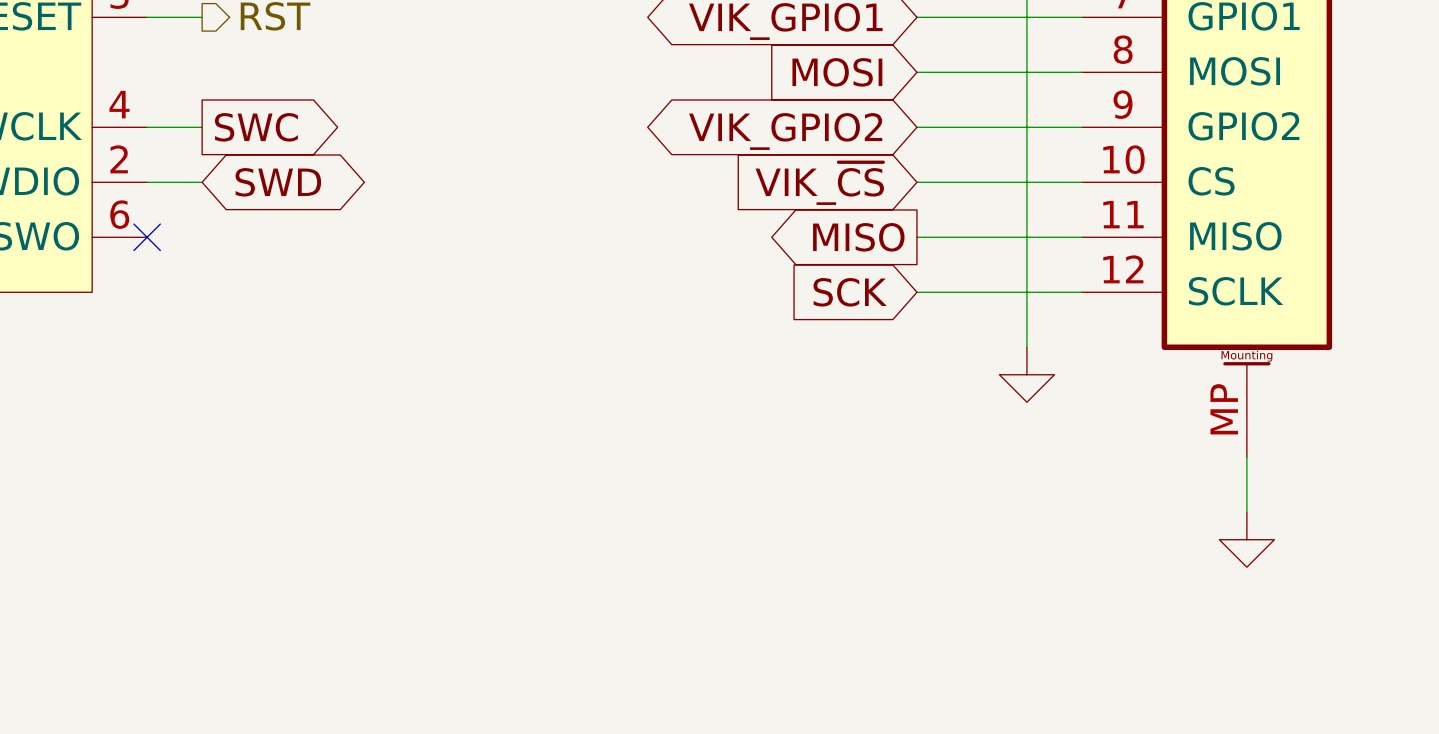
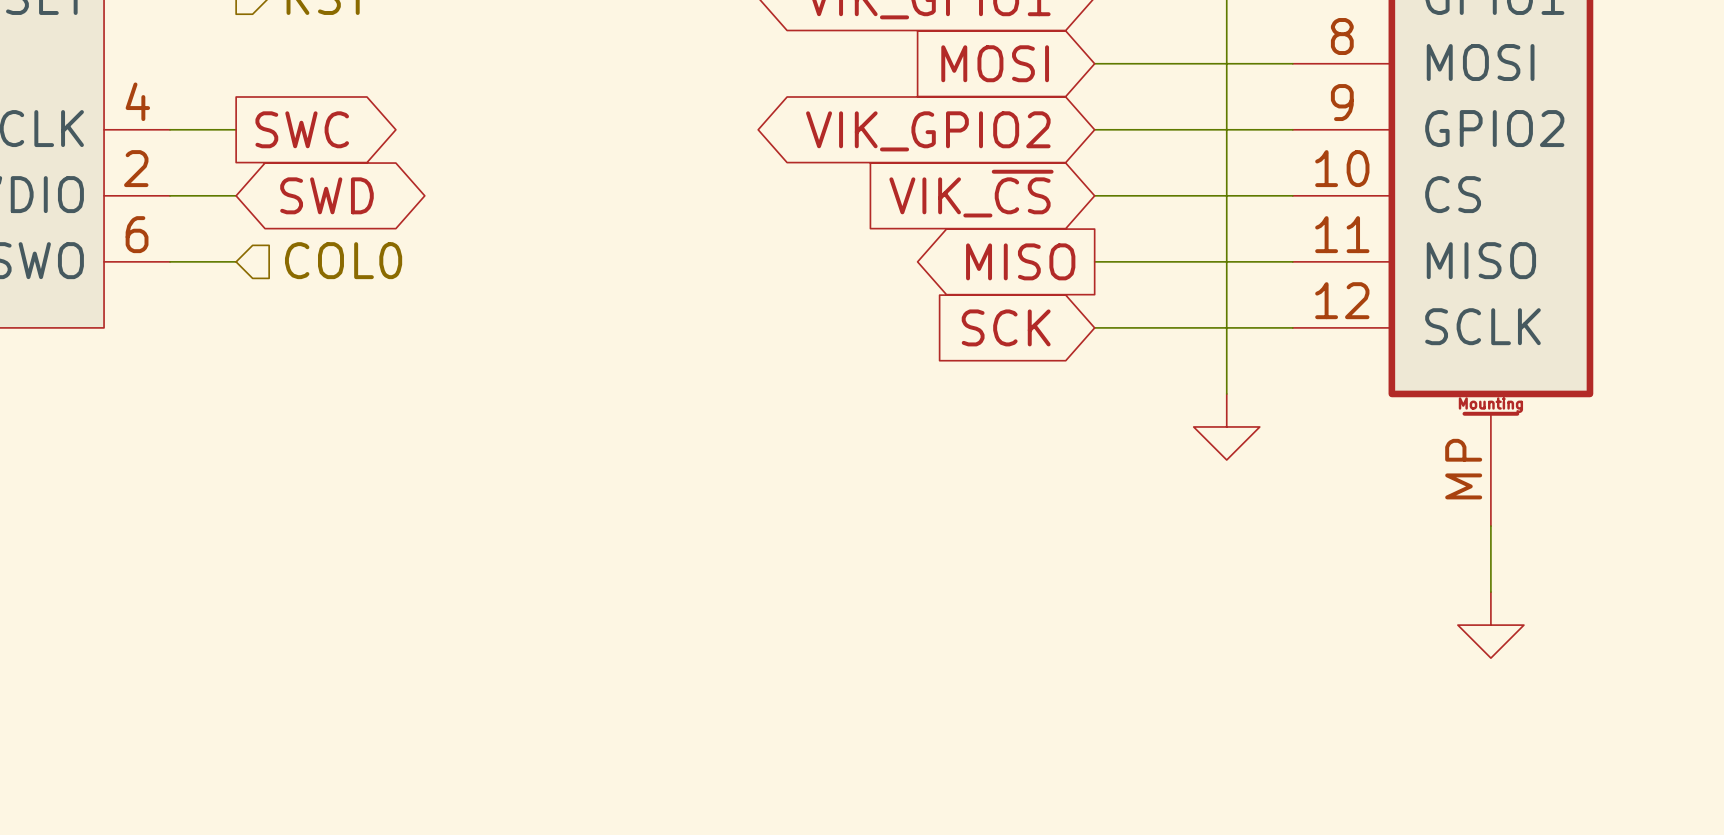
hierarchical label: none -> COL0 (343, 260)
wire: none -> (170, 261) (236, 261)
no-connect mark: (147, 237) -> none

